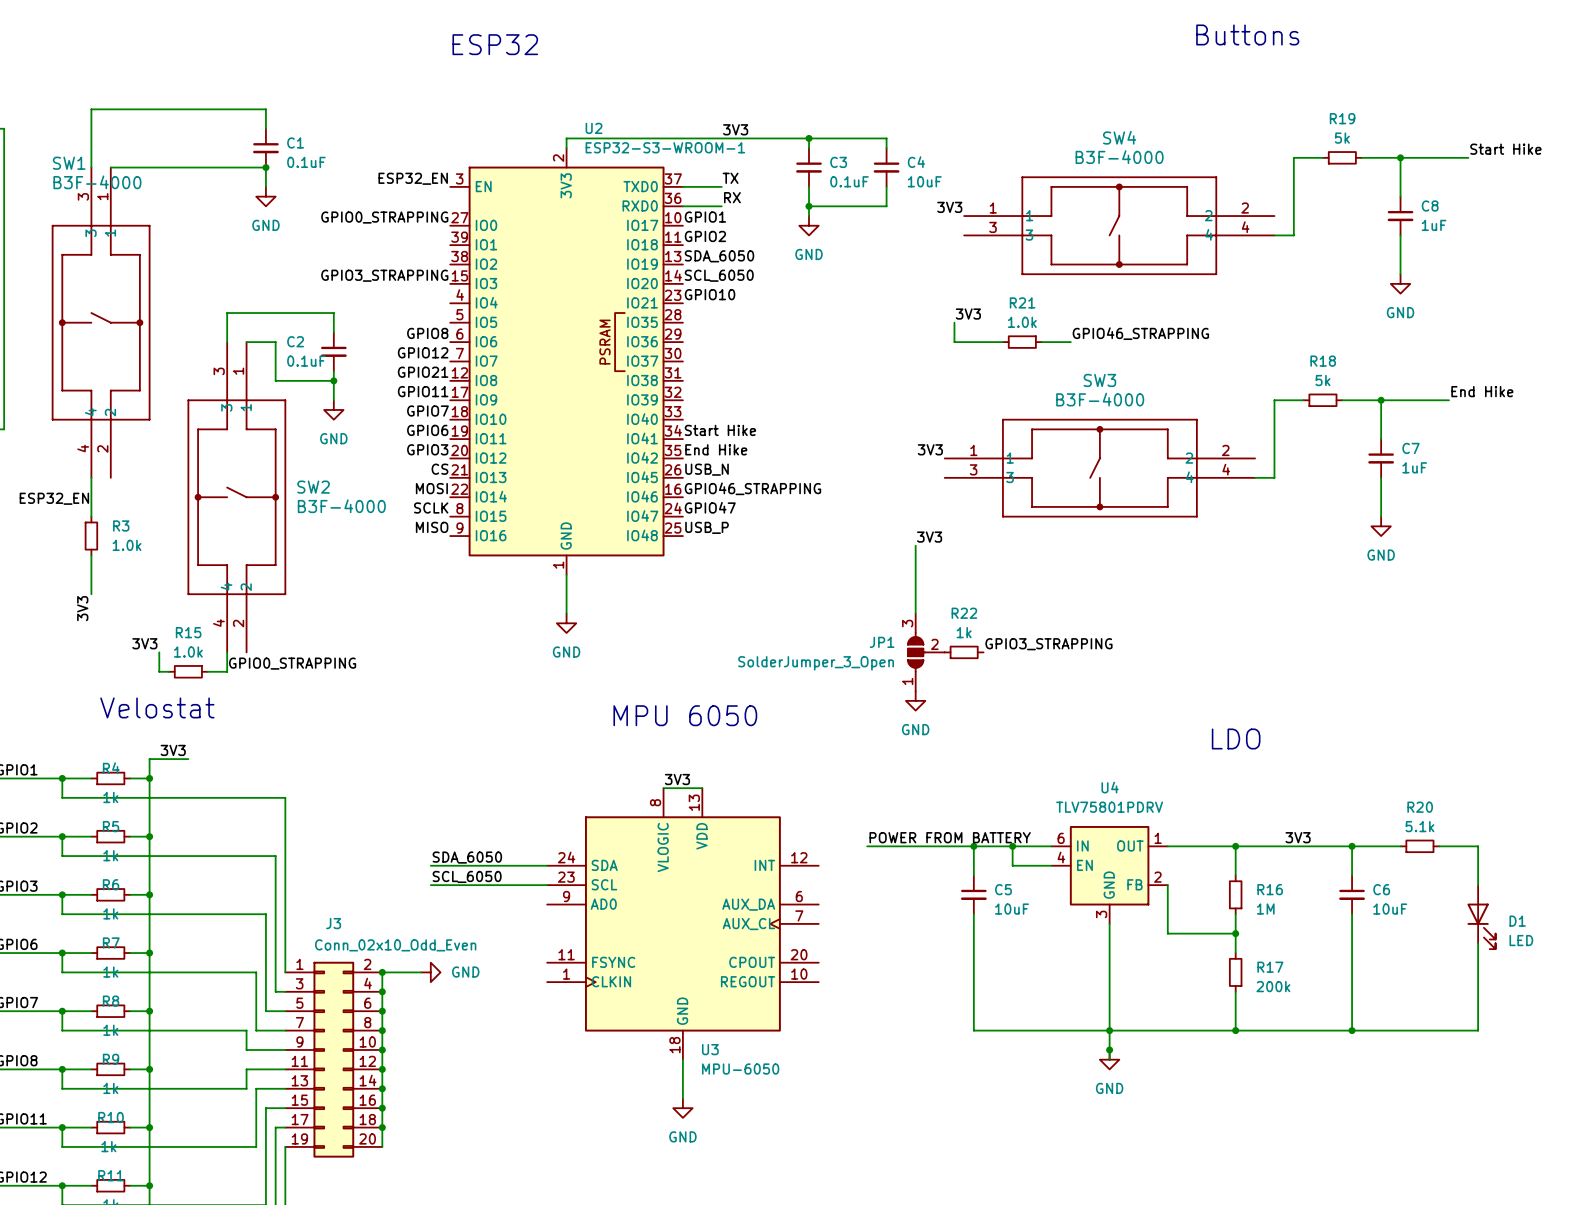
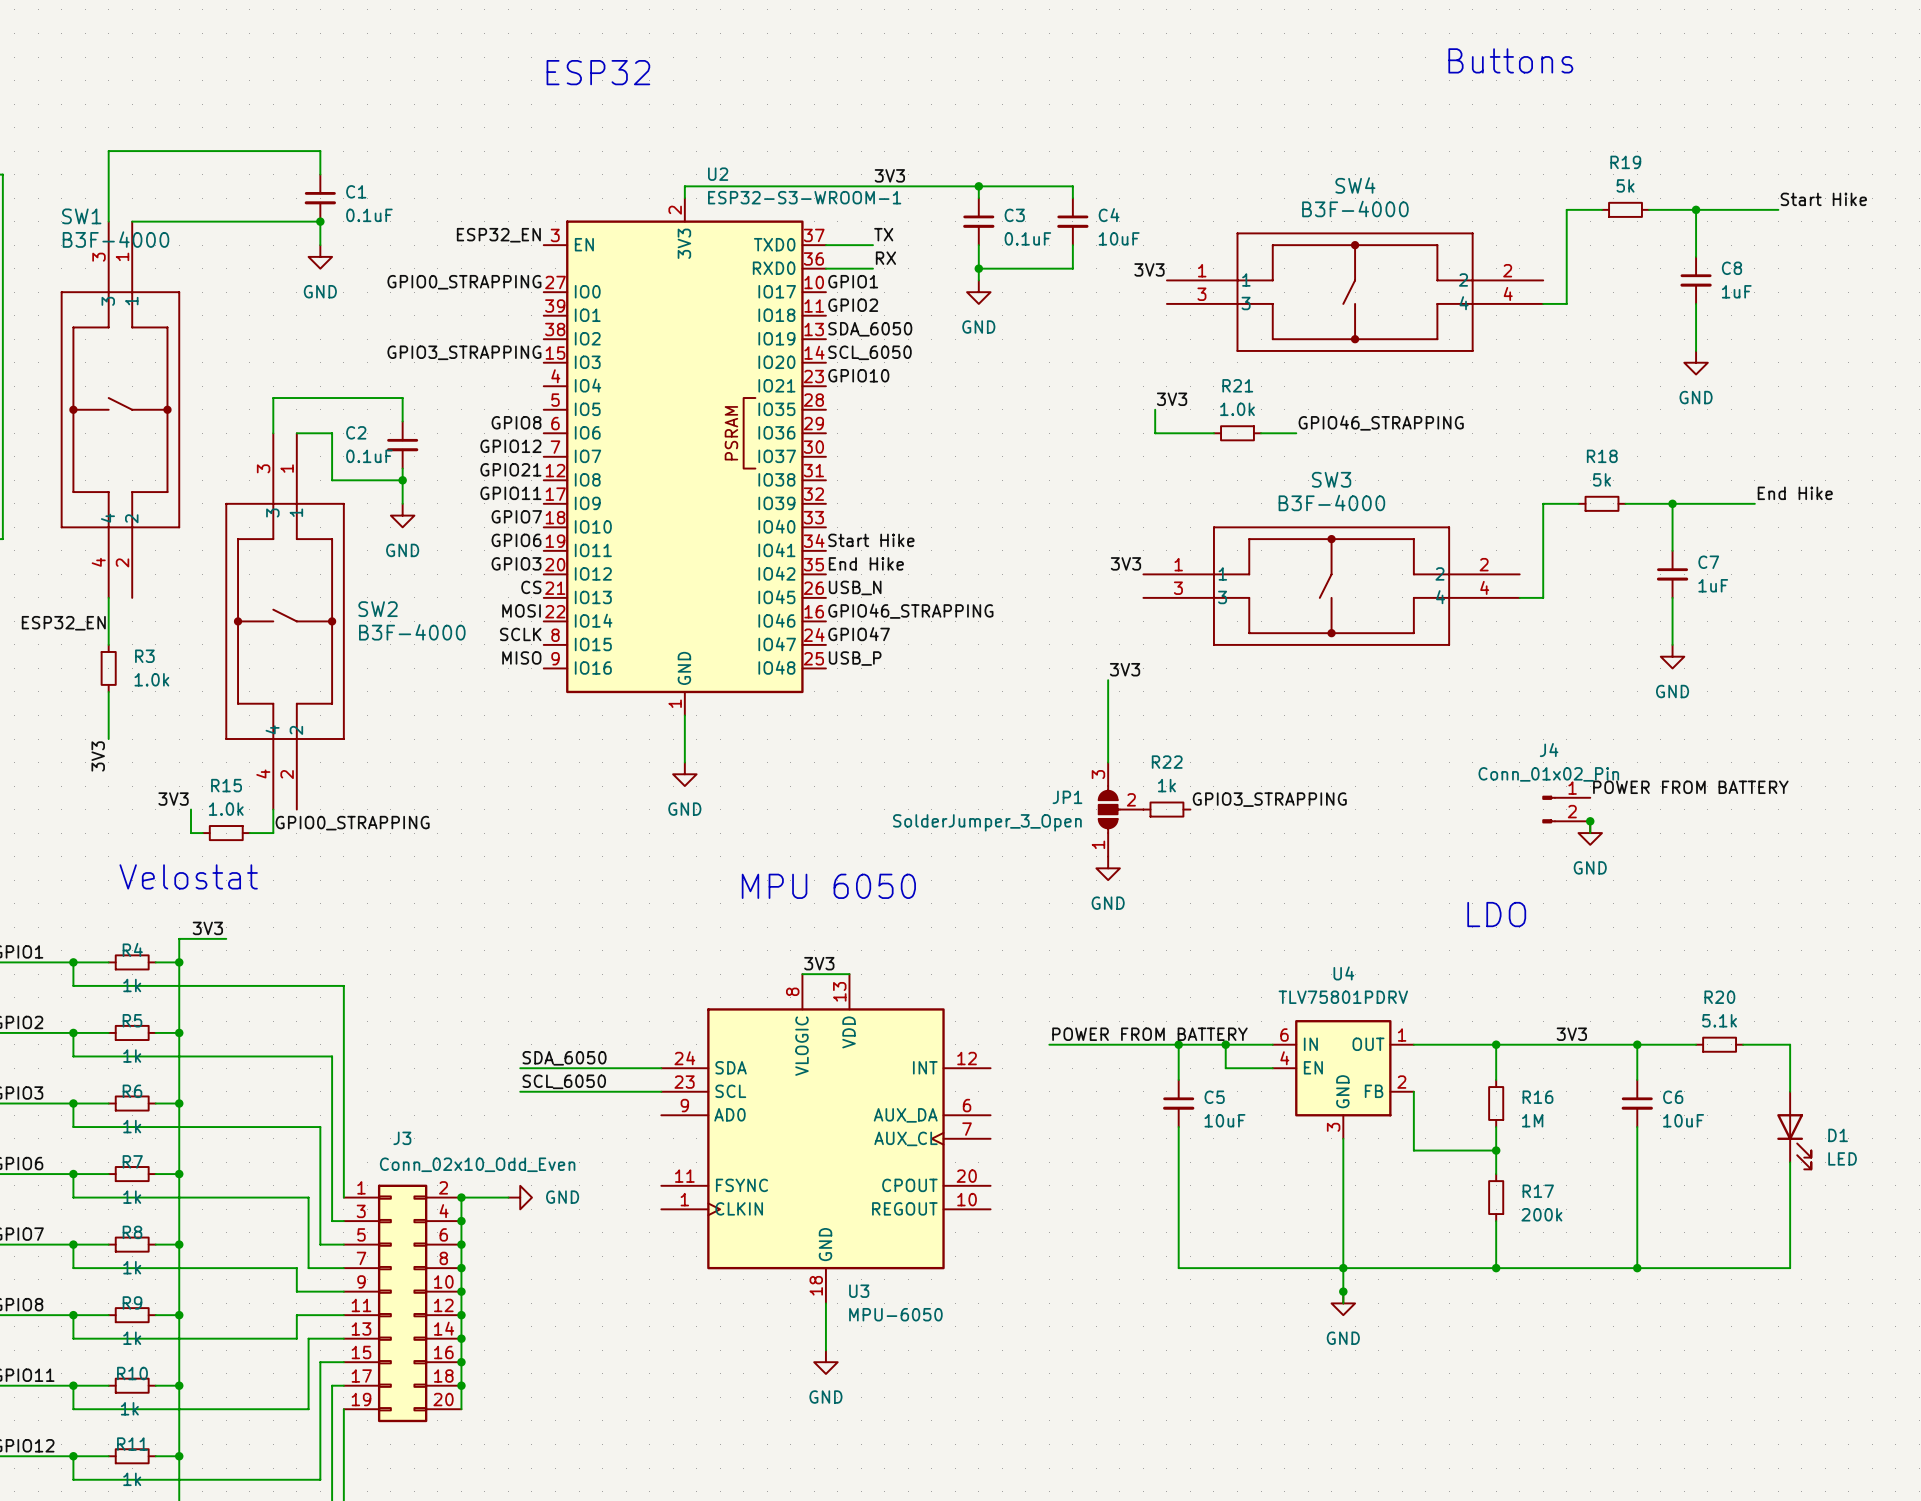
label: none -> POWER FROM BATTERY (1690, 787)
J4: none -> Conn_01x02_Pin (1566, 809)
wire: none -> (1590, 821) (1590, 833)
junction: none -> (1590, 821)
power symbol: none -> GND (1590, 833)

